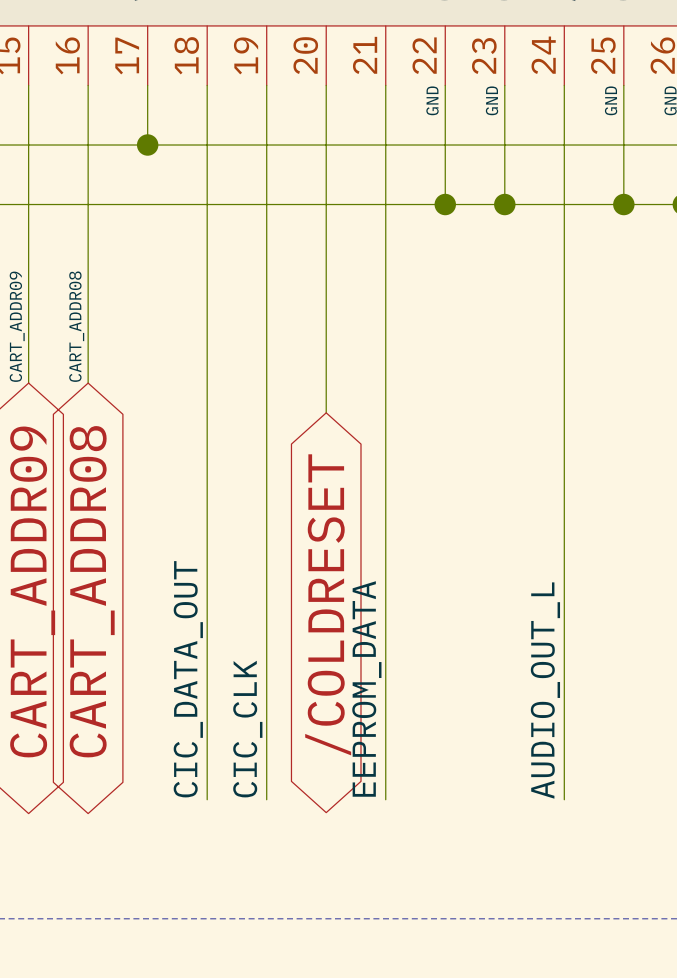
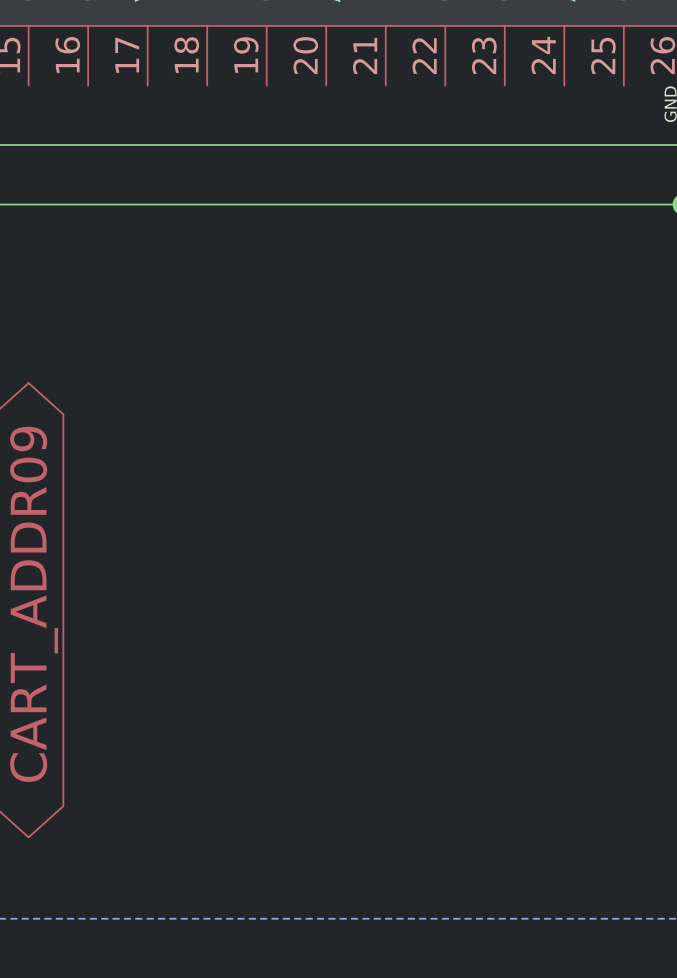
wire: (28, 85) (28, 383) -> none
wire: (88, 85) (88, 383) -> none
wire: (147, 85) (147, 145) -> none
wire: (207, 85) (207, 799) -> none
wire: (266, 85) (266, 799) -> none
wire: (326, 85) (326, 412) -> none
wire: (385, 85) (385, 799) -> none
wire: (445, 85) (445, 204) -> none
wire: (504, 85) (504, 204) -> none
wire: (564, 85) (564, 799) -> none
wire: (623, 85) (623, 204) -> none
label: GND (432, 100) -> none
label: GND (492, 100) -> none
label: GND (611, 100) -> none
junction: (147, 145) -> none
junction: (445, 204) -> none
junction: (504, 204) -> none
junction: (623, 204) -> none
label: CART_ADDR09 (17, 326) -> none
label: CART_ADDR08 (76, 326) -> none
global label: CART_ADDR08 (92, 591) -> none
global label: /COLDRESET (328, 604) -> none
label: CIC_DATA_OUT (188, 679) -> none
label: EEPROM_DATA (366, 688) -> none
label: AUDIO_OUT_L (545, 690) -> none
label: CIC_CLK (247, 729) -> none

